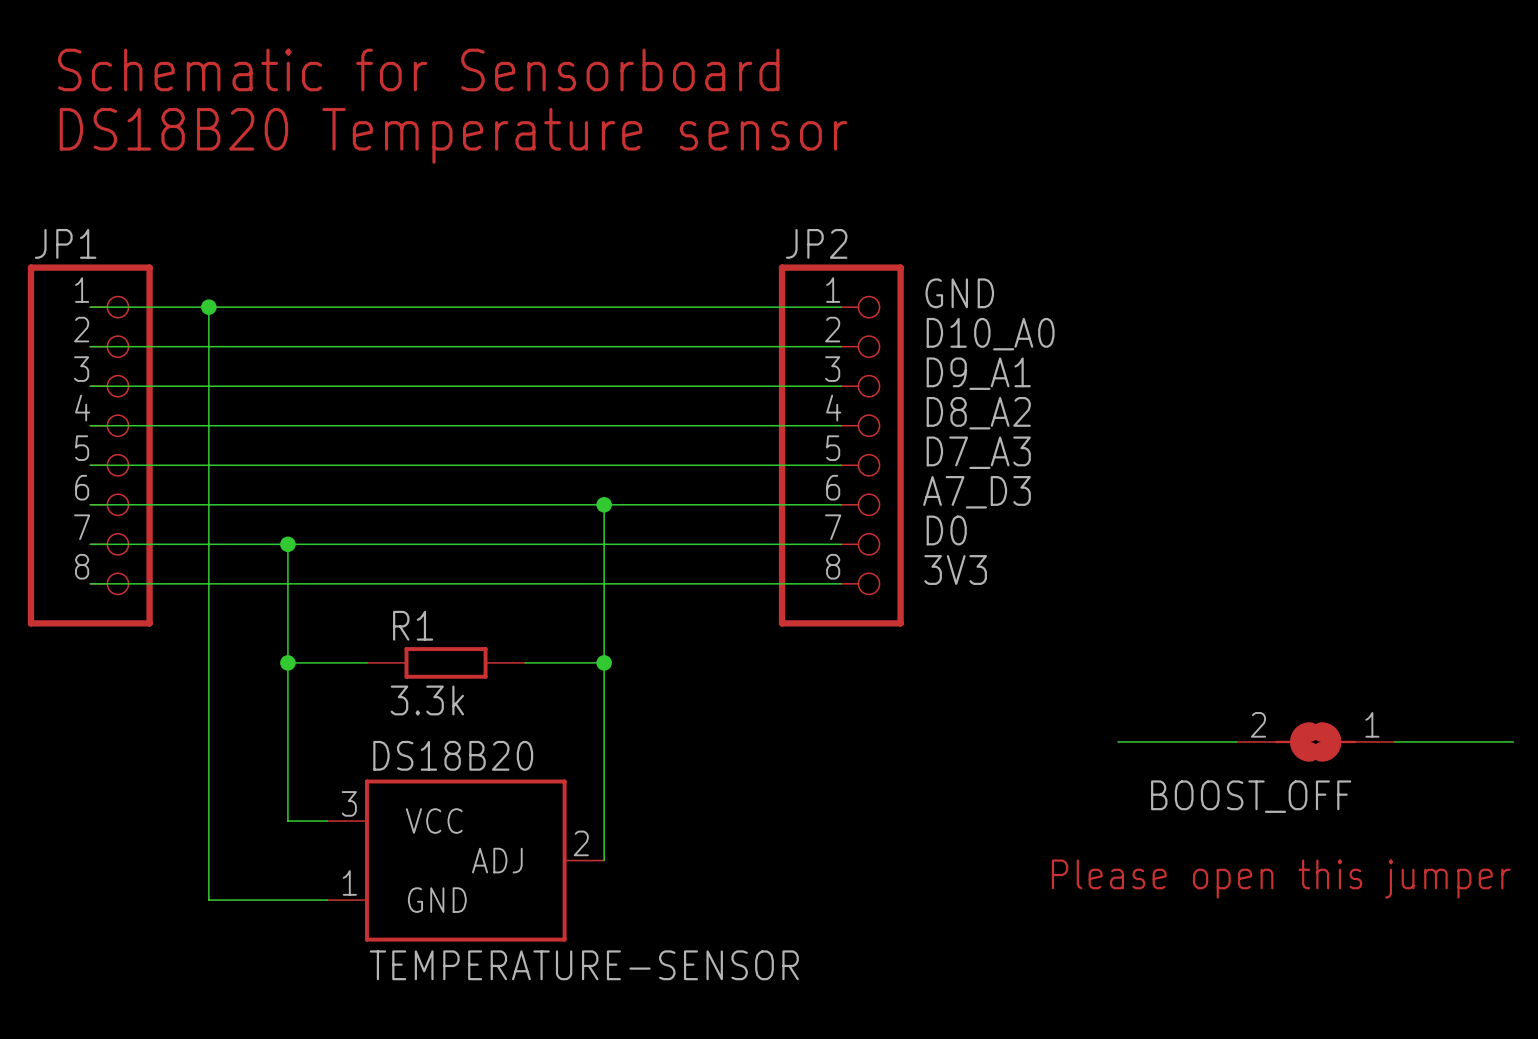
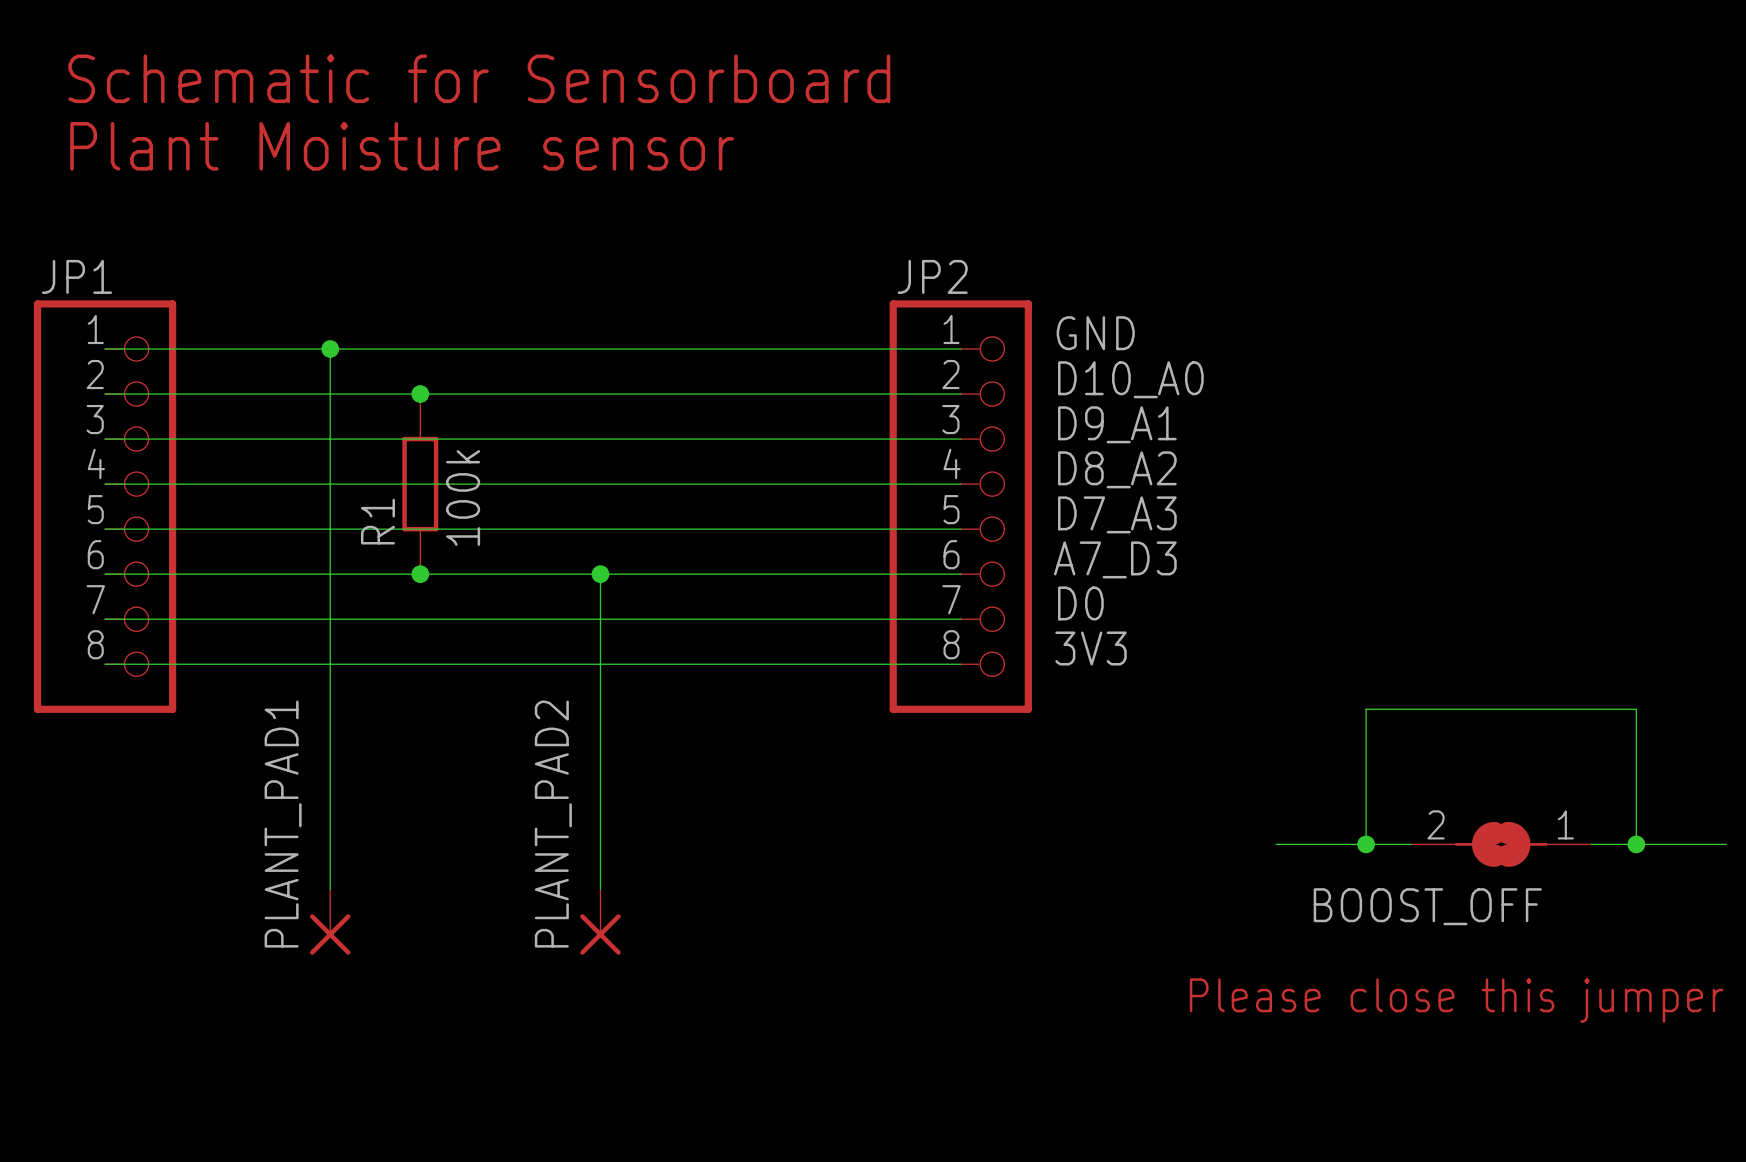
text: DS18B20 Temperature sensor (453, 135) -> Plant Moisture sensor (402, 146)
wire: (208, 307) (208, 900) (327, 900) -> none
junction position: (208, 307) -> (330, 348)
wire: none -> (330, 348) (330, 619)
junction: none -> (420, 394)
junction: none -> (420, 574)
wire: none -> (600, 574) (600, 889)
wire: (604, 504) (604, 860) -> none
junction position: (604, 504) -> (600, 574)
junction: (287, 544) -> none
R1 name position: R1 (413, 625) -> R1 (377, 521)
wire: (287, 662) (366, 662) -> none
junction: (287, 662) -> none
R1 rotation: 0° (446, 662) -> 90° clockwise (420, 484)
R1 position: (446, 662) -> (420, 484)
wire: (525, 662) (604, 662) -> none
junction: (604, 662) -> none
R1 value: 3.3k (427, 700) -> 100k (463, 497)
wire: none -> (1366, 844) (1366, 709) (1636, 709) (1636, 844)
junction: none -> (1366, 844)
junction: none -> (1636, 844)
wire: (287, 781) (287, 821) (327, 821) -> none
PLANT_PAD1: none -> (330, 922)
PLANT_PAD2: none -> (600, 922)
DS18B20: TEMPERATURE-SENSOR (465, 860) -> none
text: Please open this jumper (1281, 879) -> Please close this jumper (1456, 1000)

